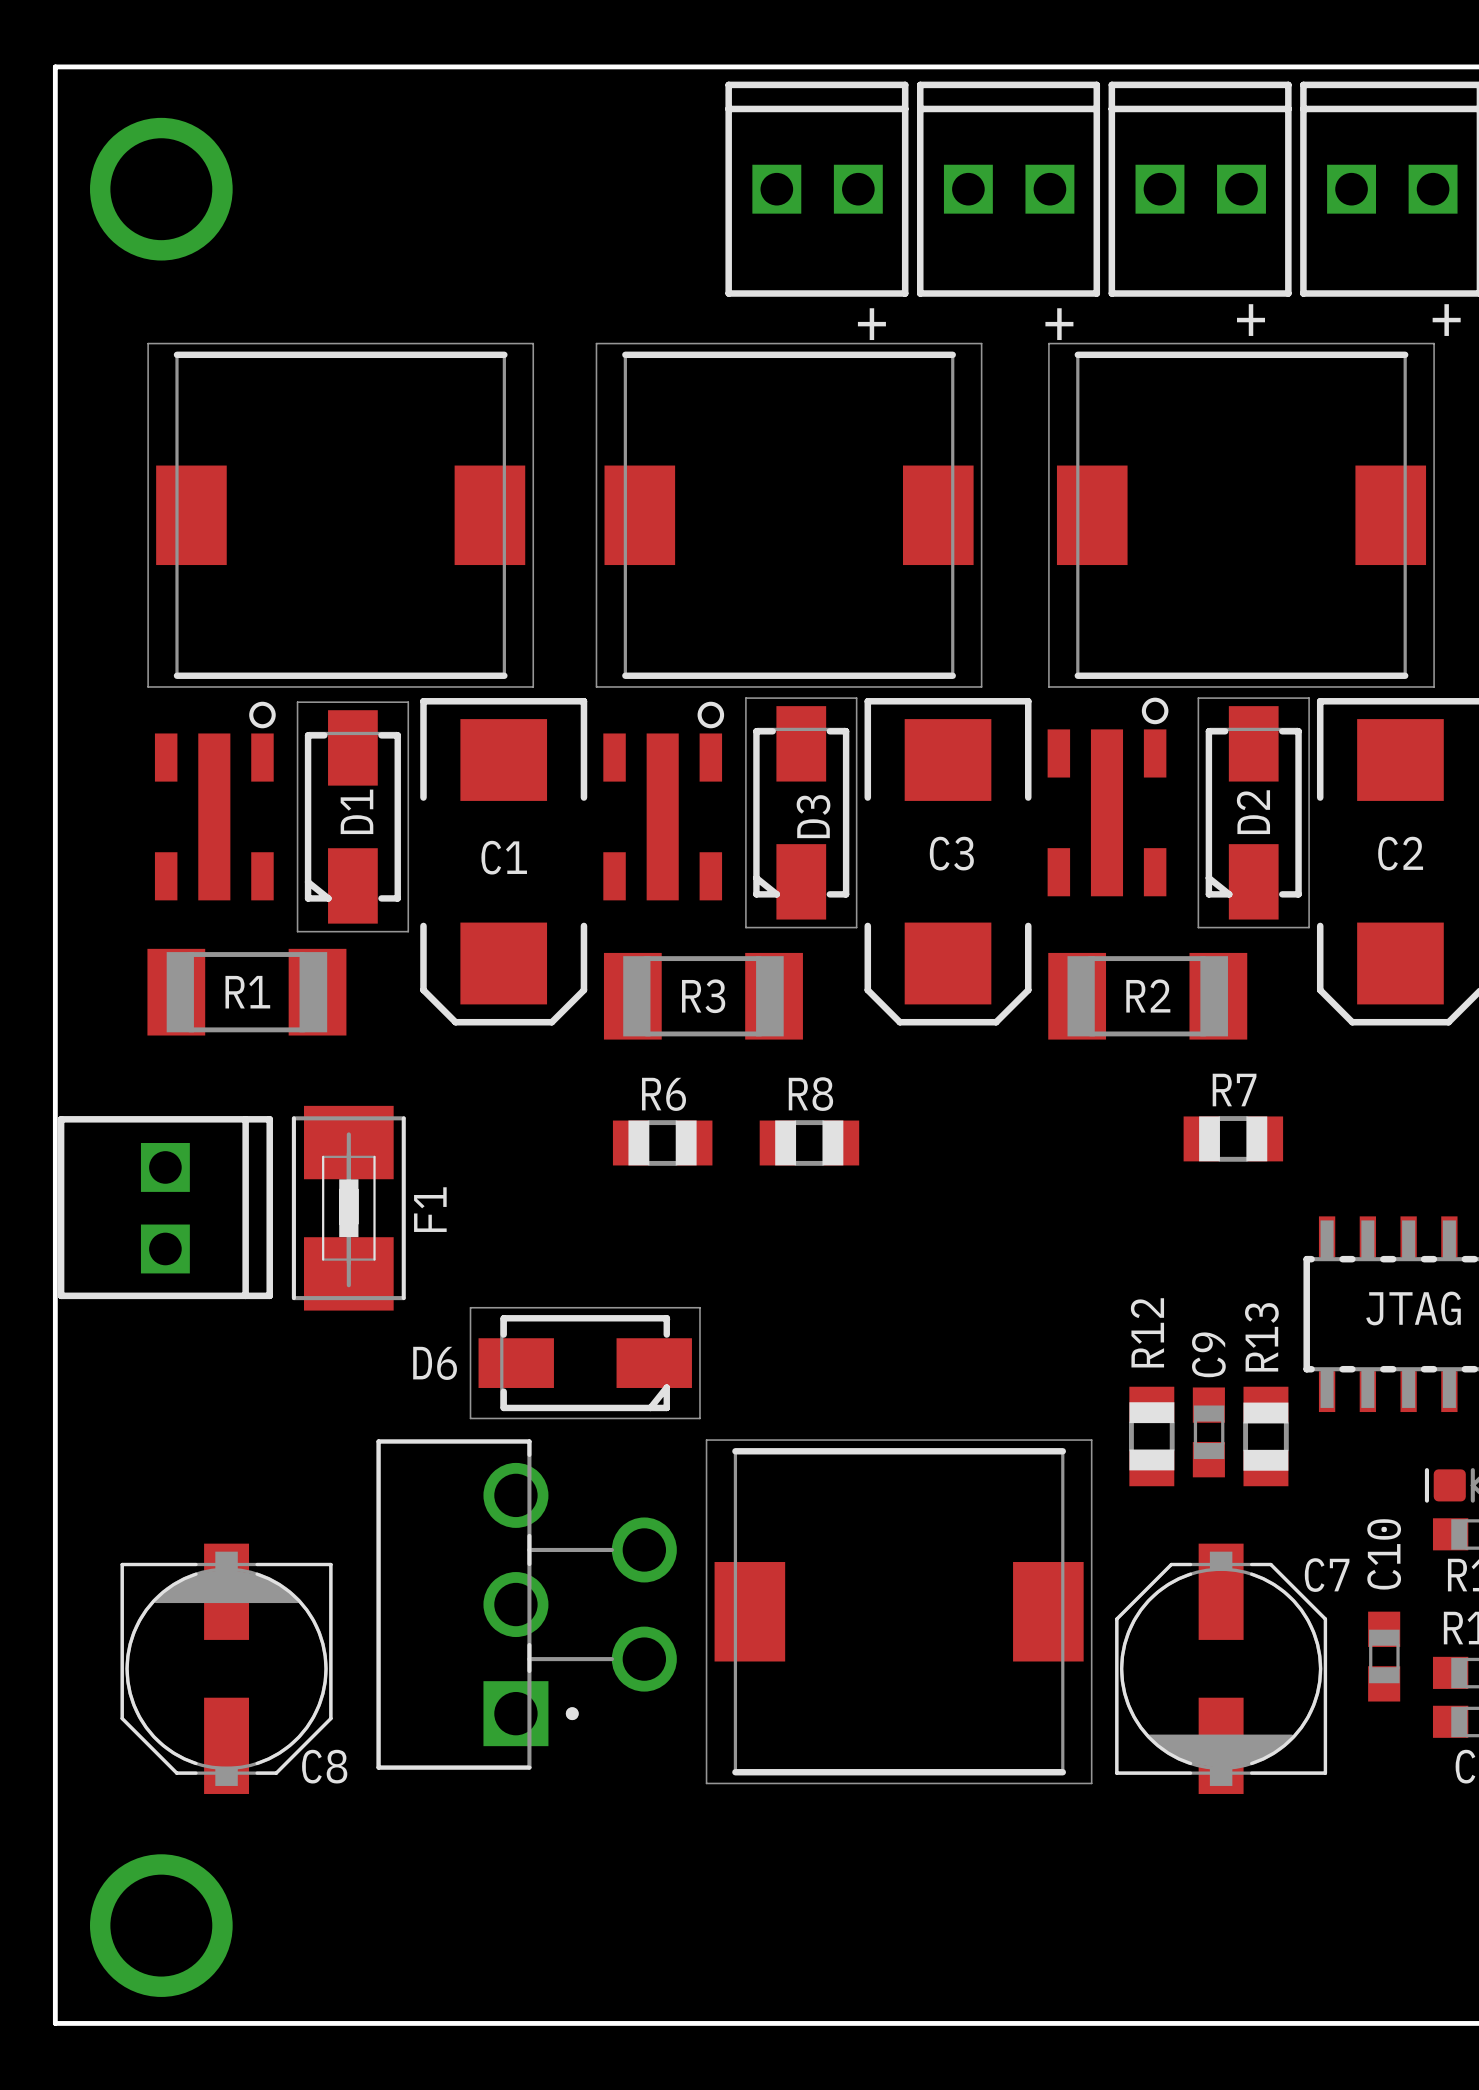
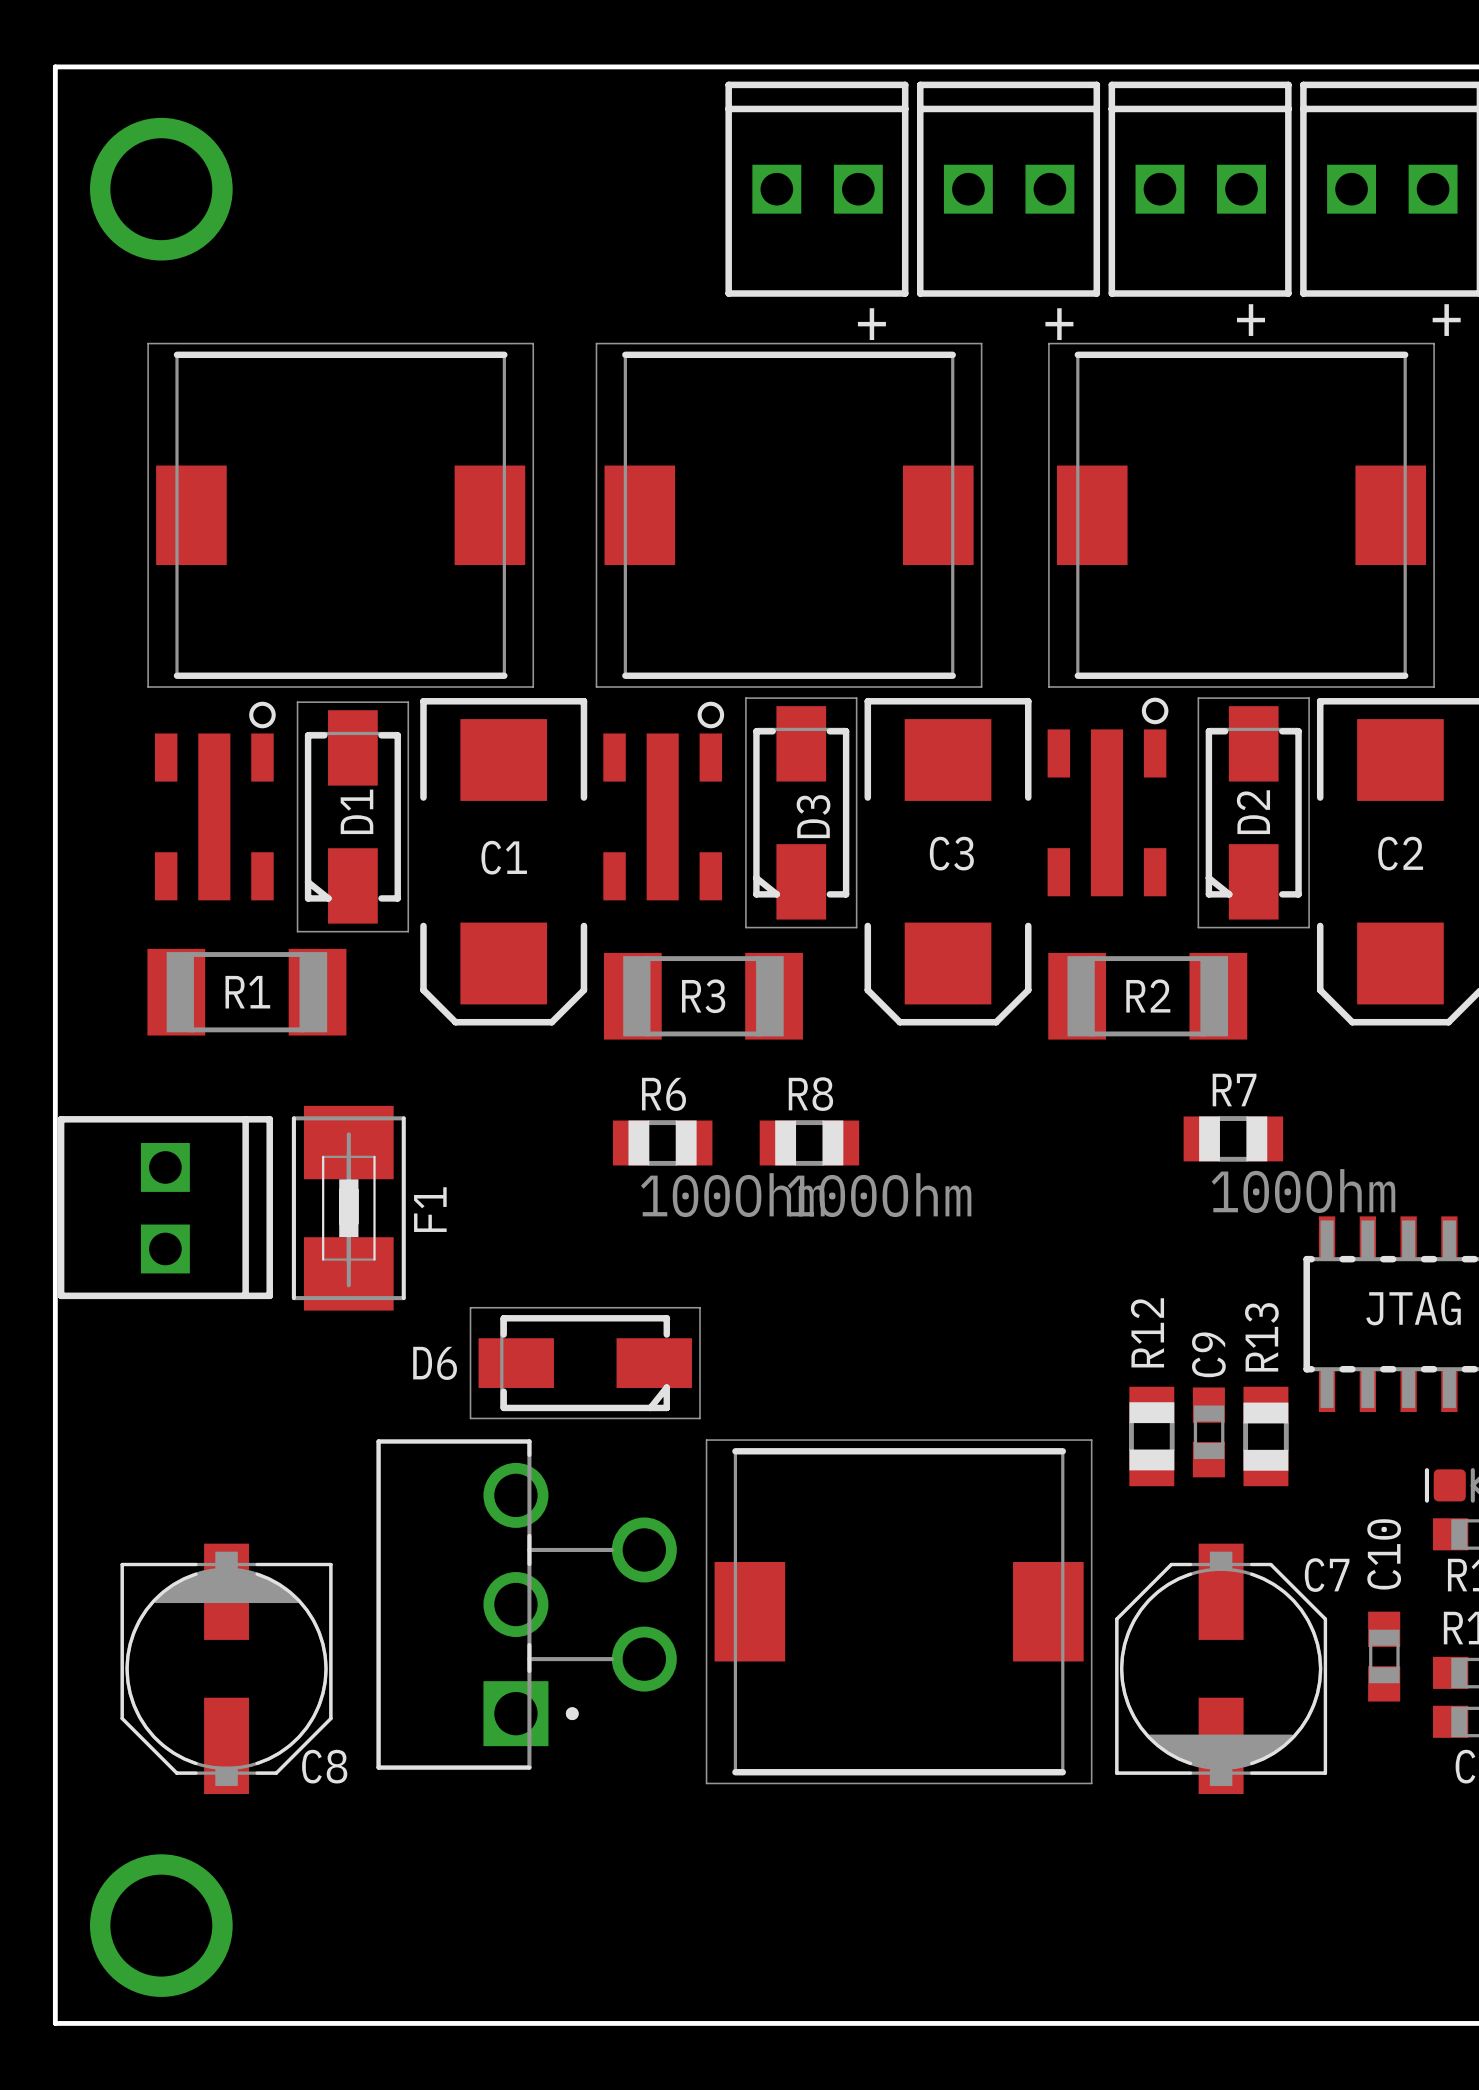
R7 value: none -> 100Ohm (1303, 1191)
R6 value: none -> 100Ohm (732, 1195)
R8 value: none -> 100Ohm (879, 1195)

